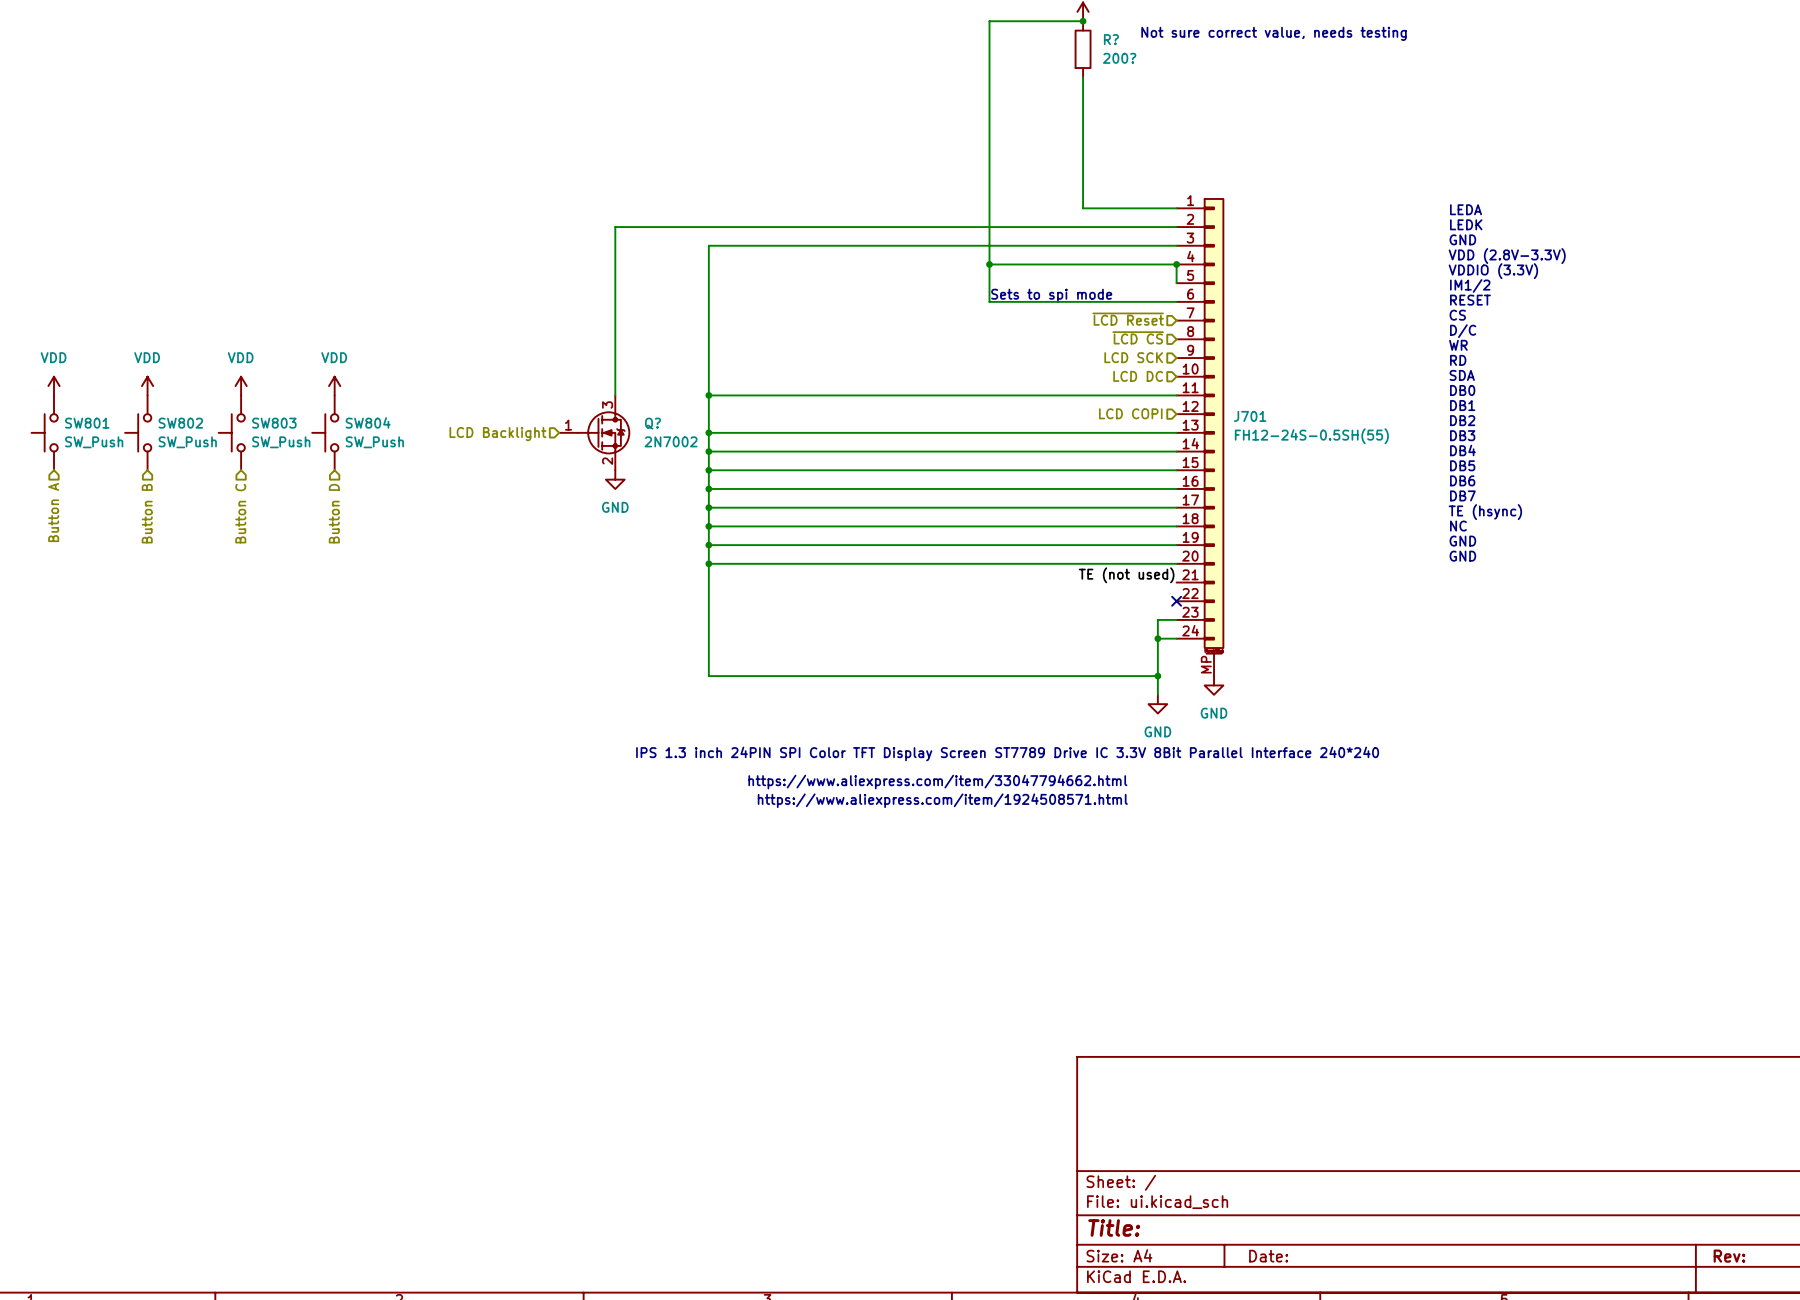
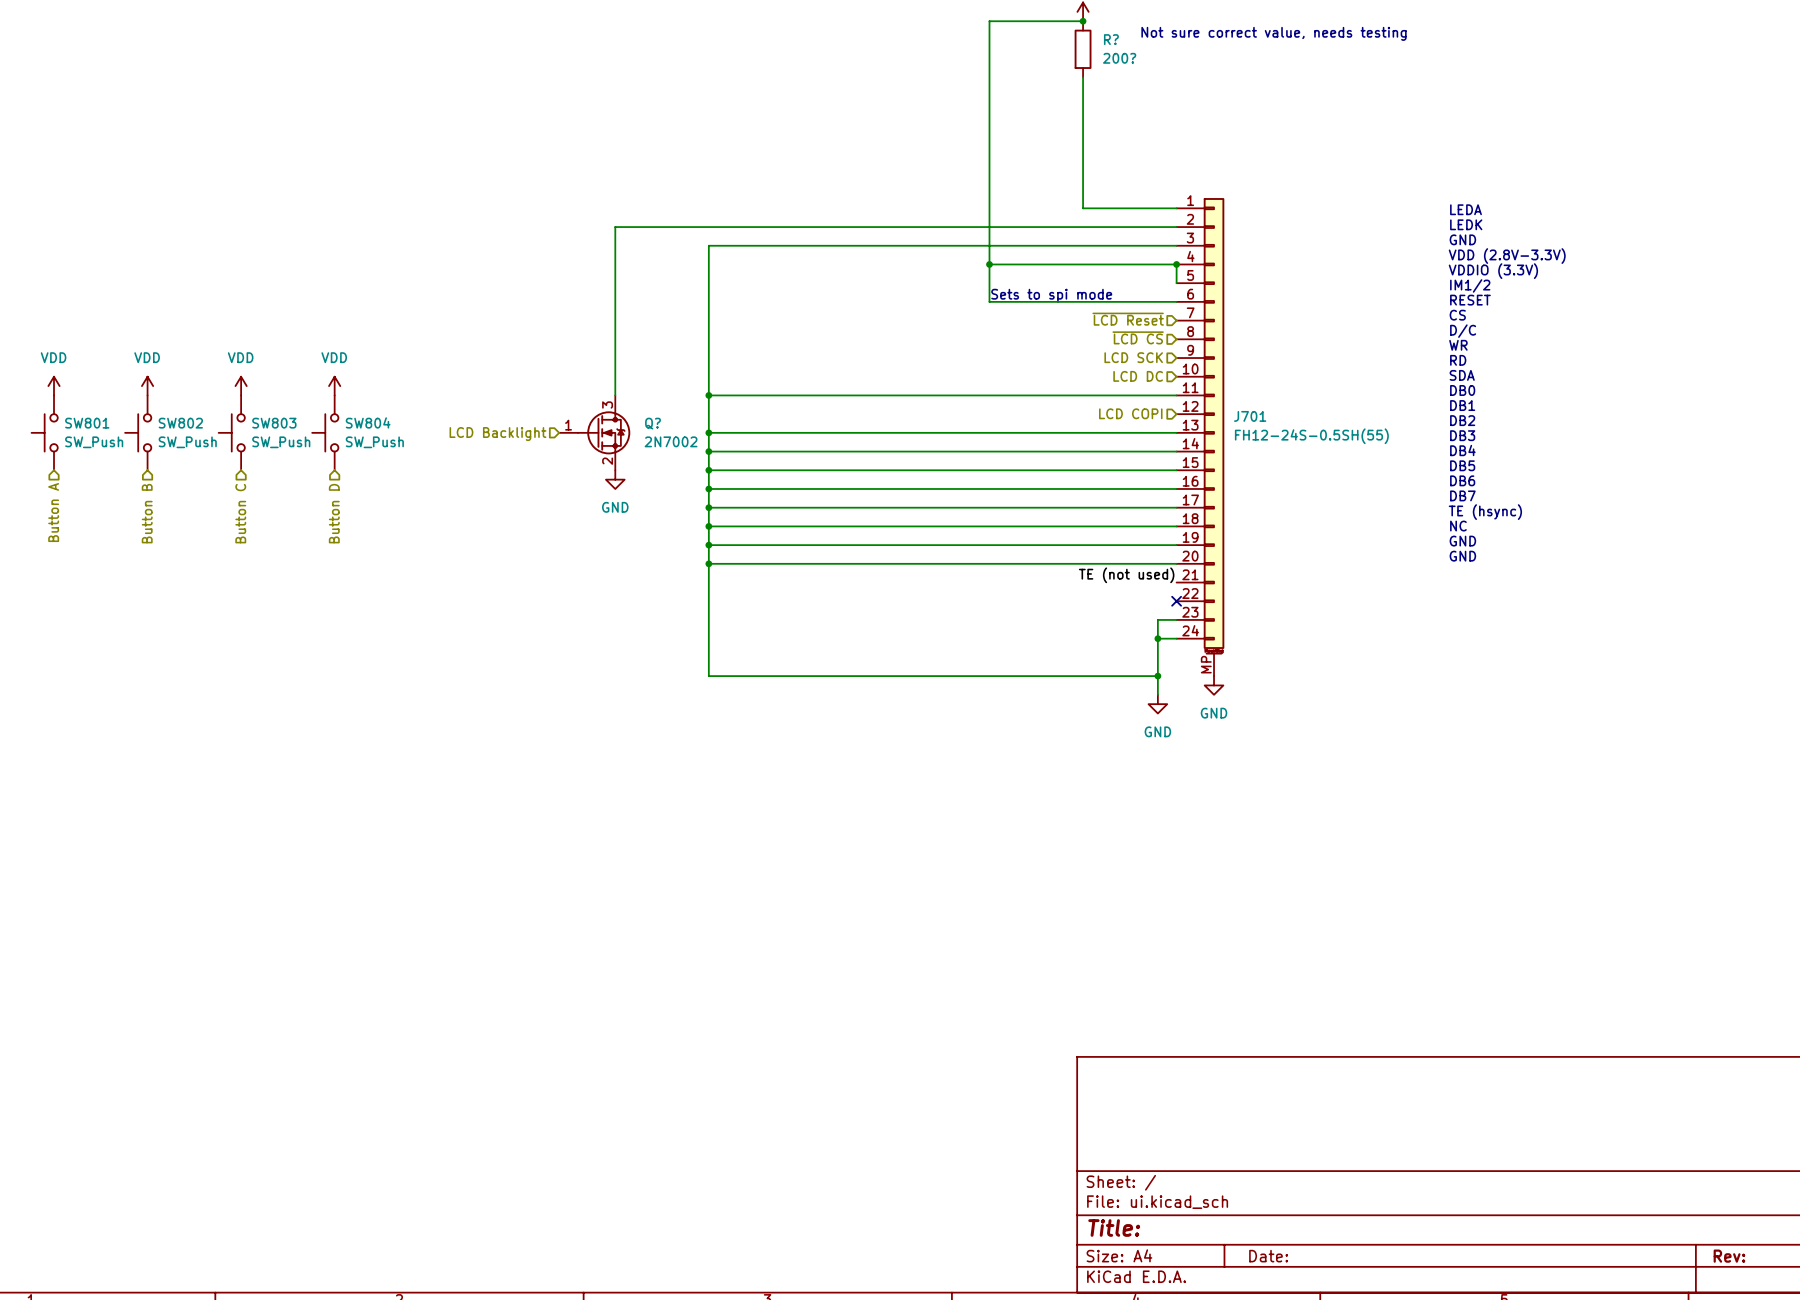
text: IPS 1.3 inch 24PIN SPI Color TFT Display Screen ST7789 Drive IC 3.3V 8Bit Parallel Interface 240*240 (1007, 753) -> none
text: https://www.aliexpress.com/item/33047794662.html (937, 782) -> none
text: https://www.aliexpress.com/item/1924508571.html (942, 800) -> none

